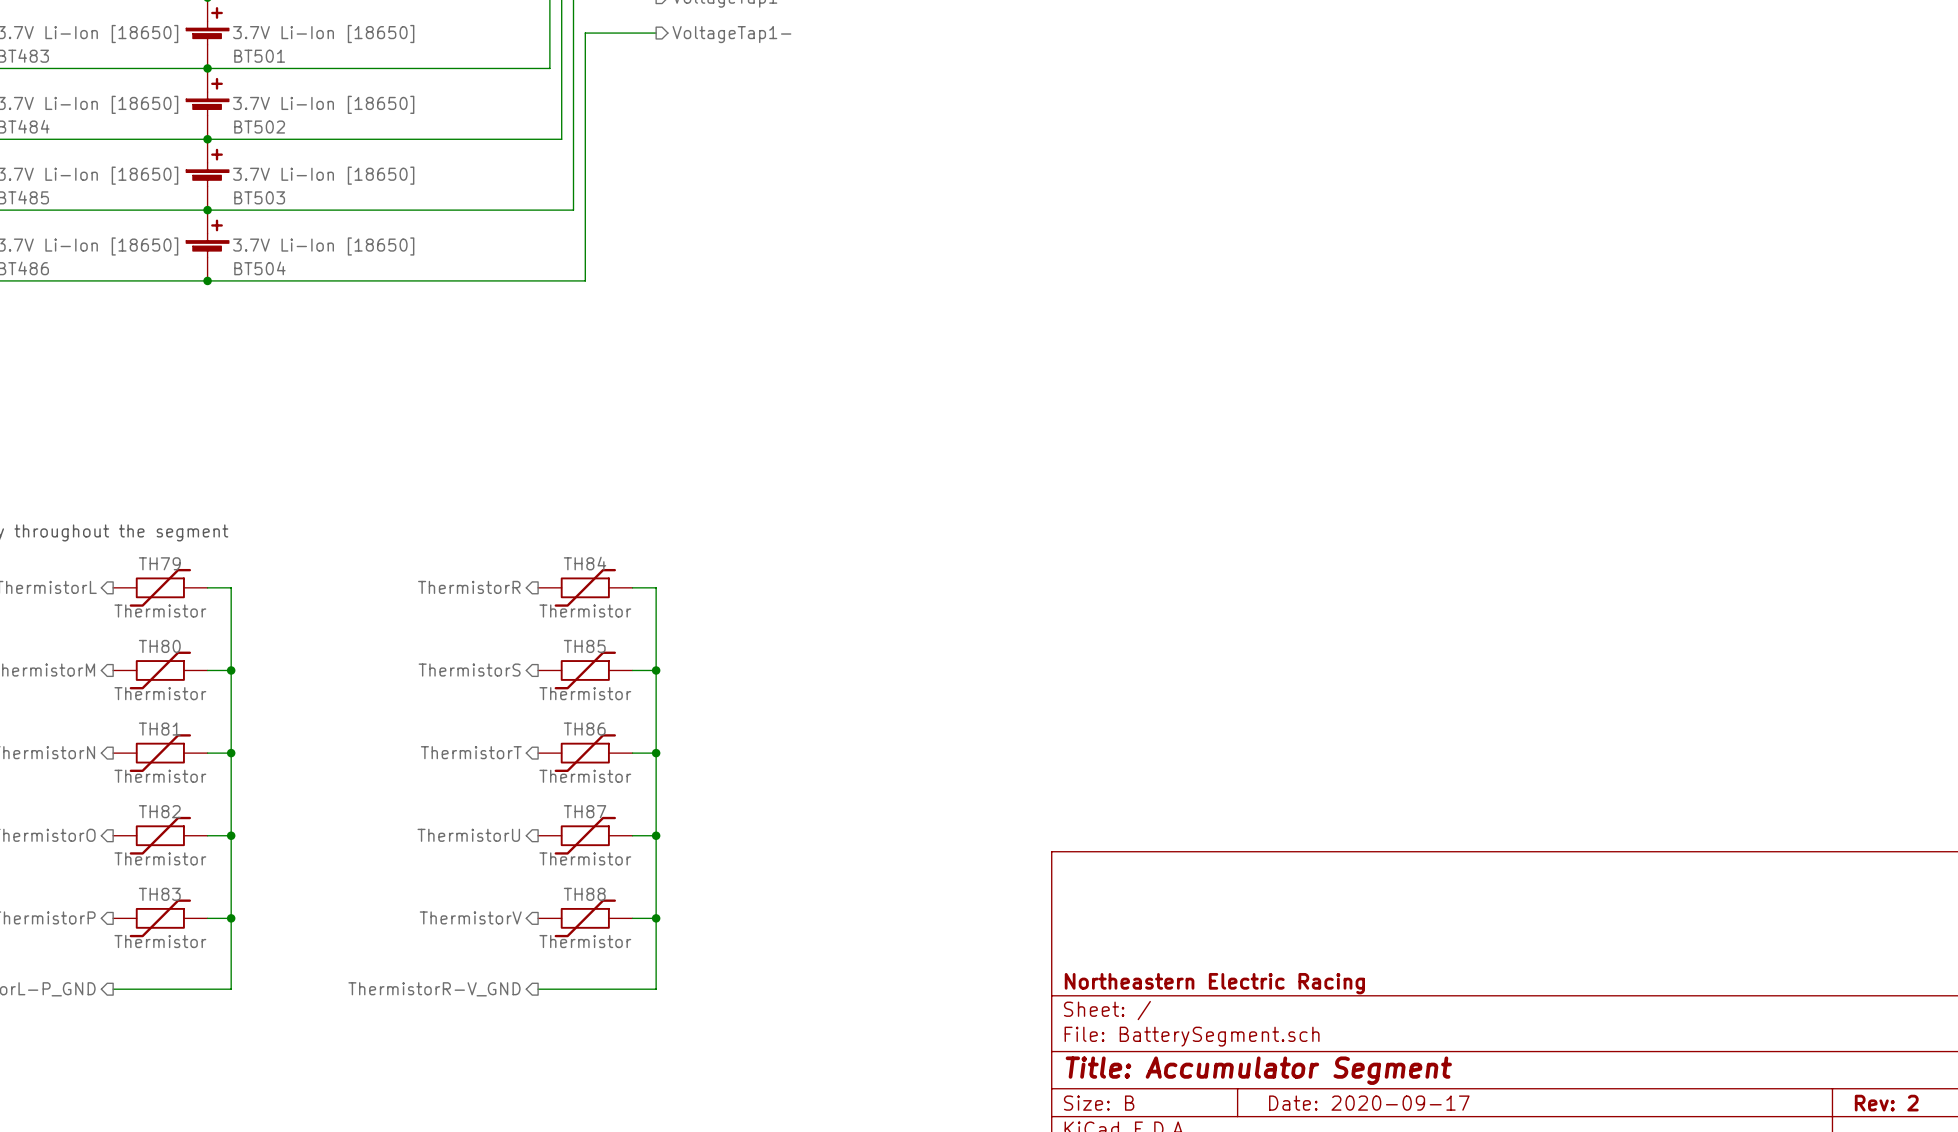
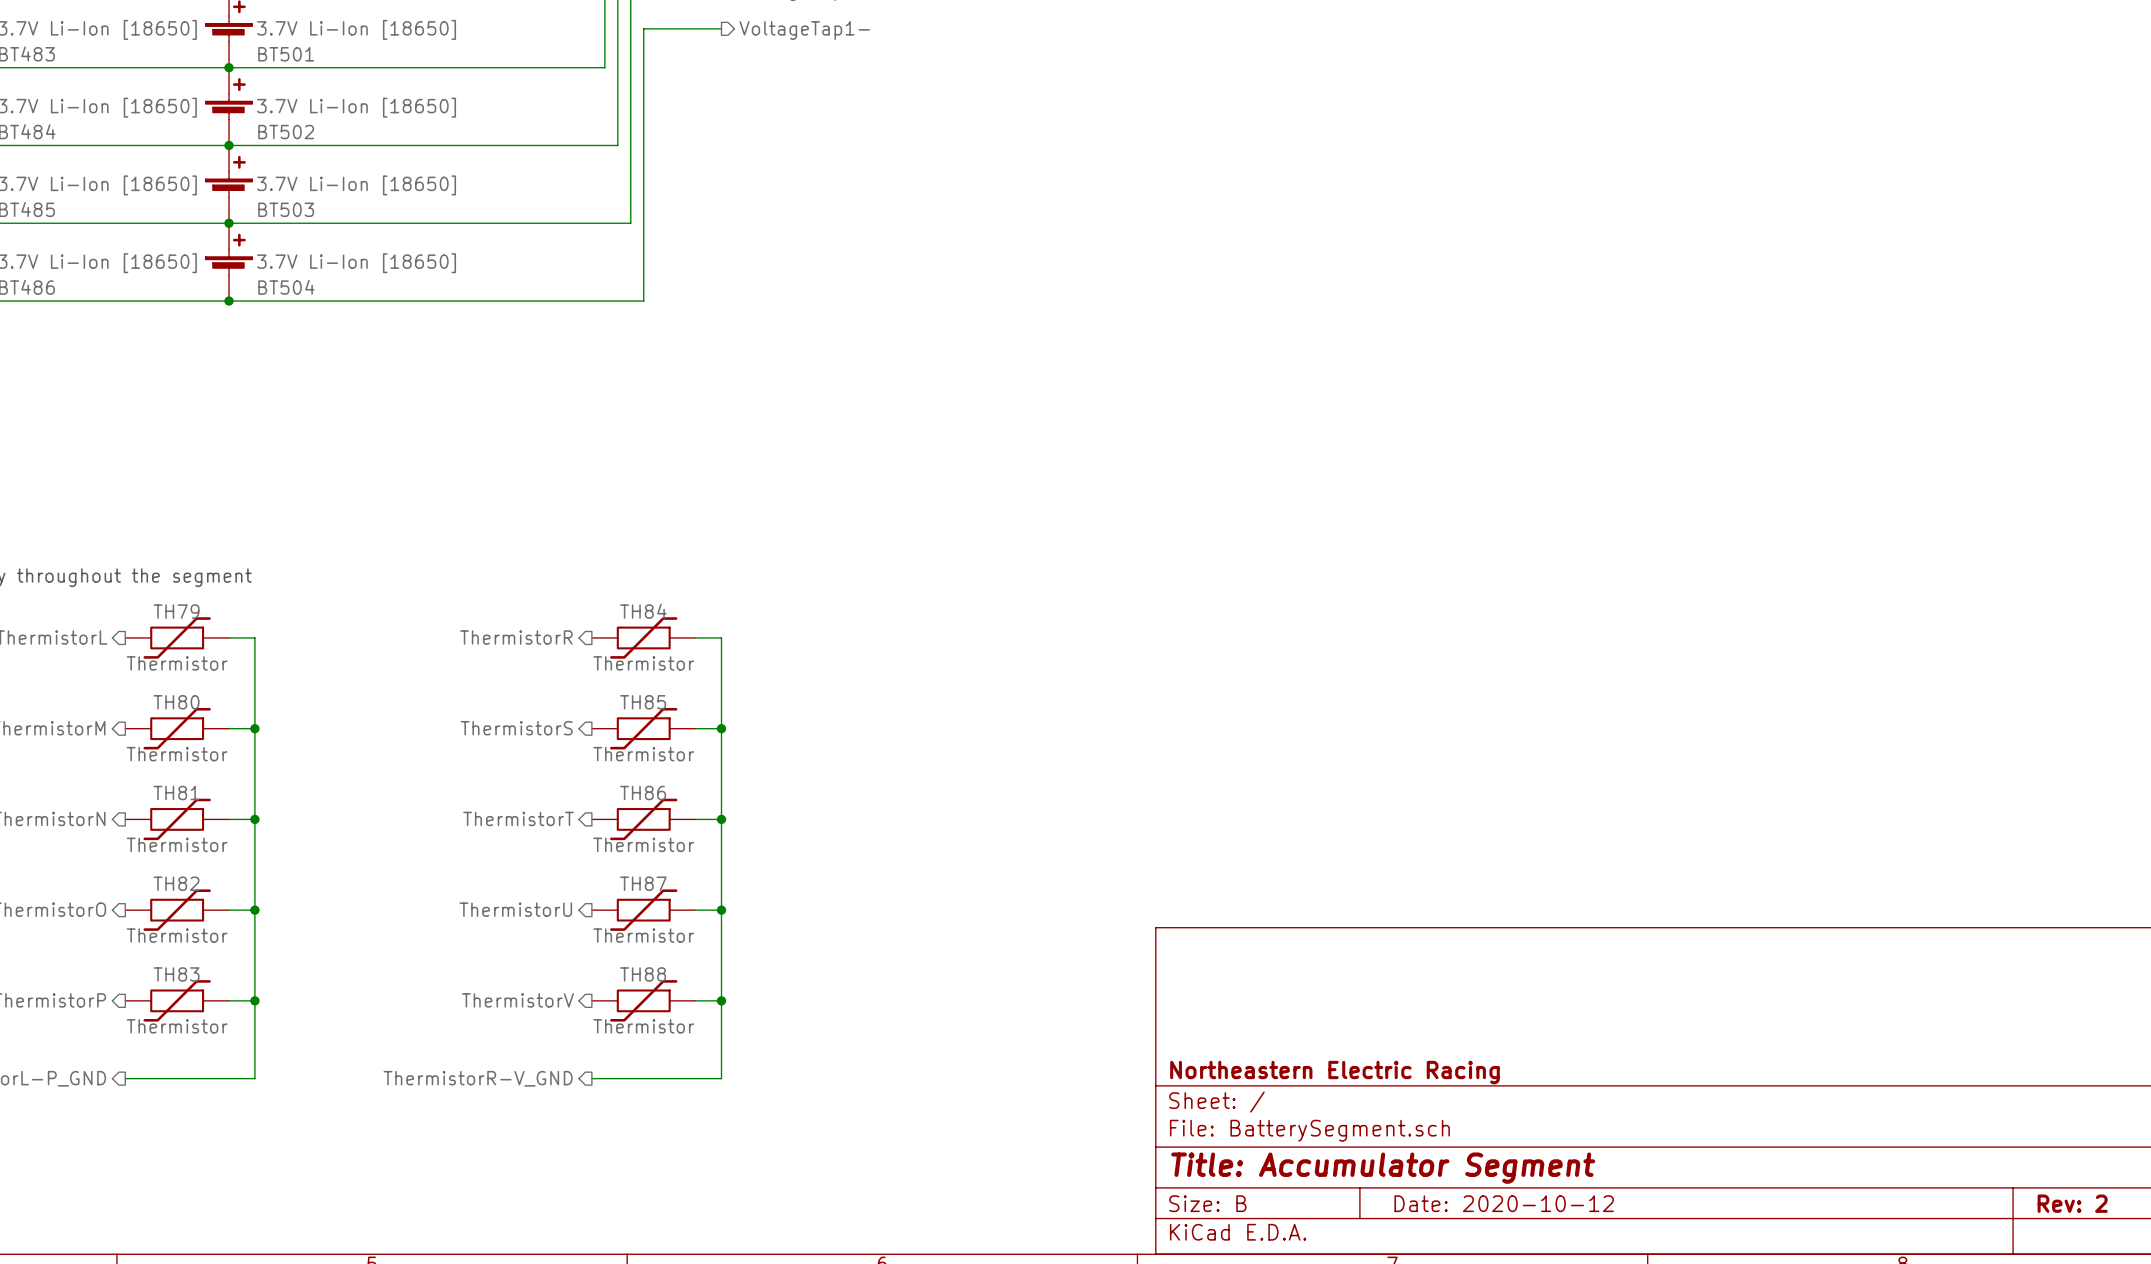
title block: Date: 2020-09-17 (1369, 1103) -> Date: 2020-10-12 (1504, 1203)

